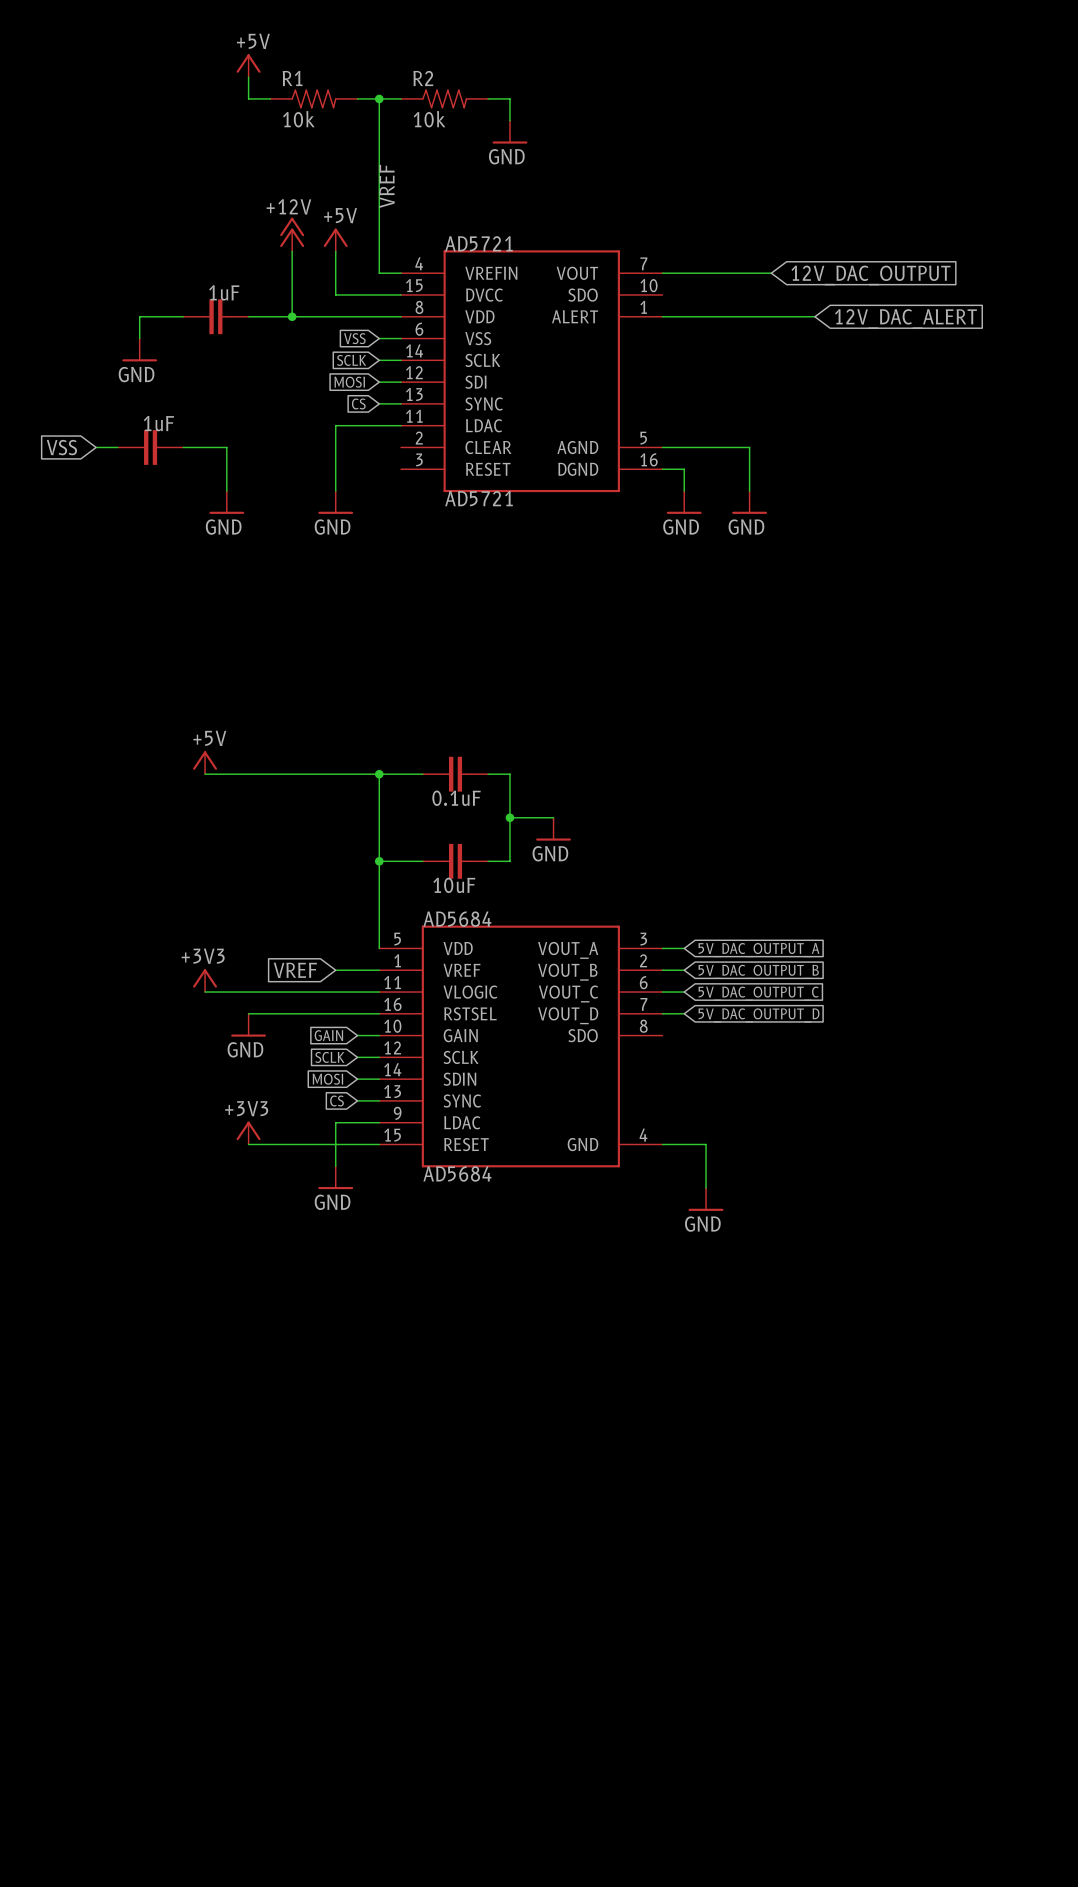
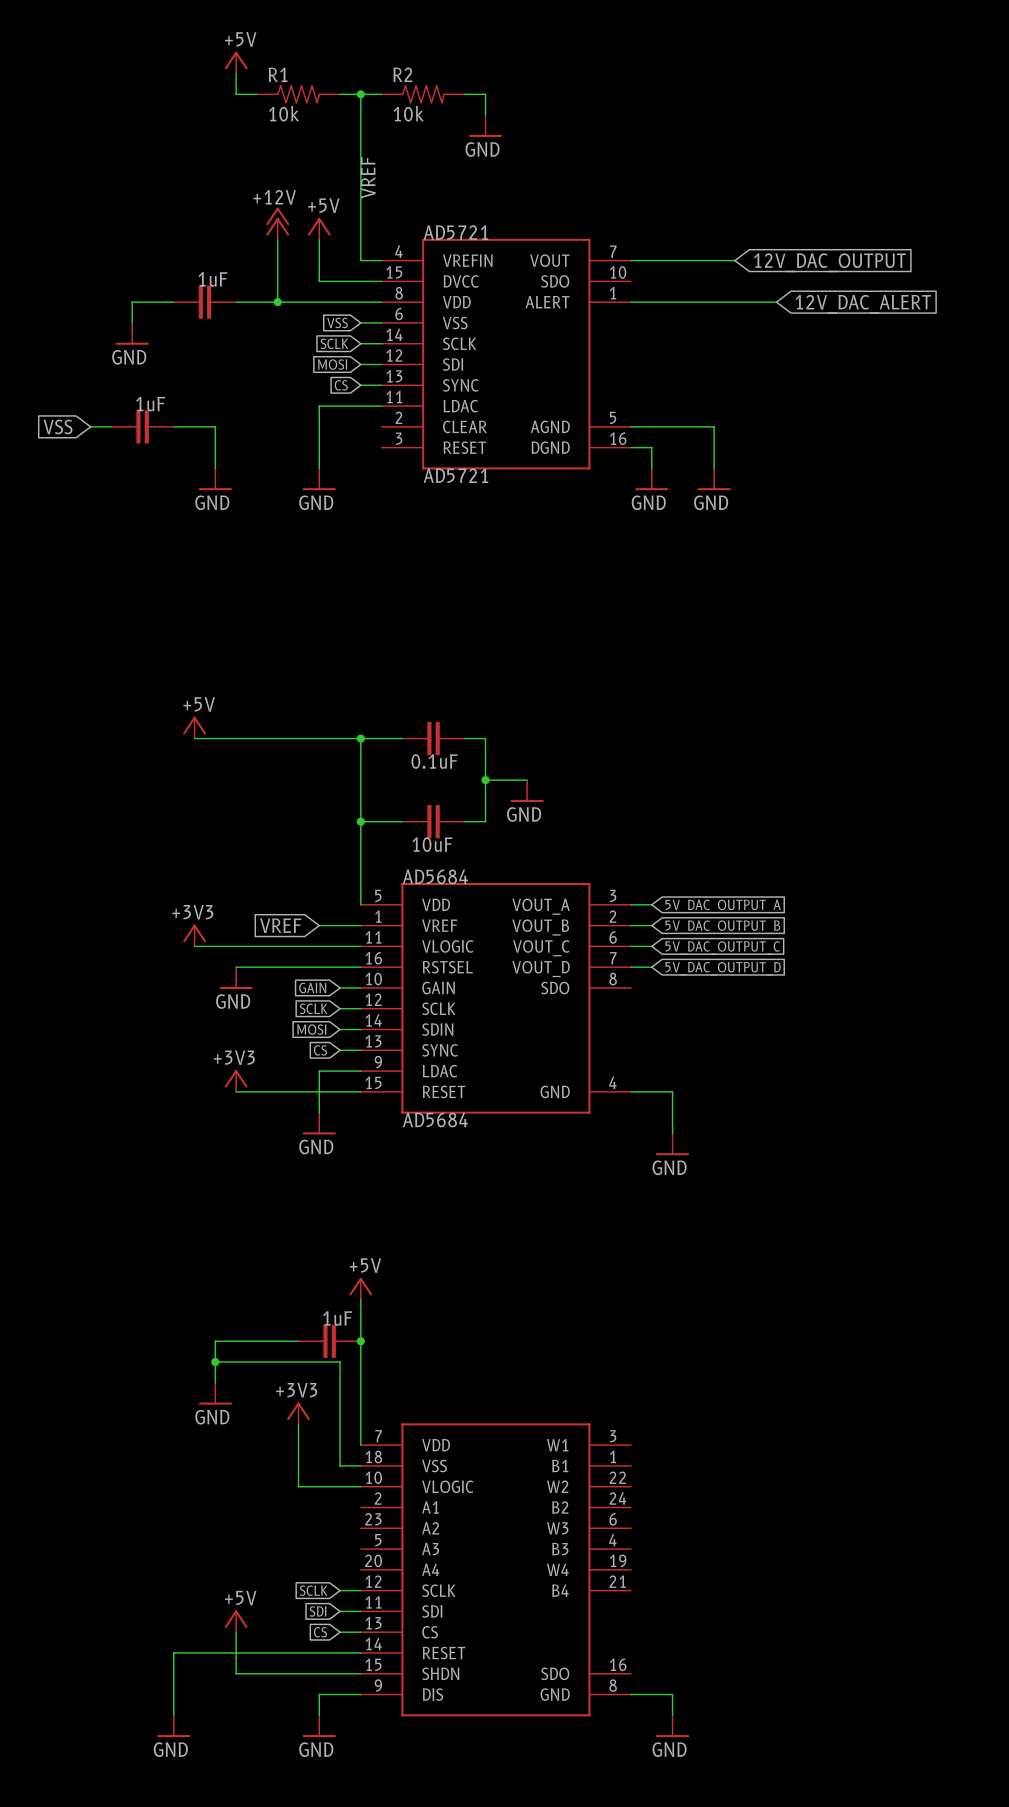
power symbol: none -> +5V (360, 1288)
wire: none -> (360, 1299) (360, 1445)
wire: none -> (298, 1341) (215, 1341) (215, 1382)
part: none -> 1uF (329, 1341)
junction: none -> (360, 1341)
wire: none -> (215, 1362) (340, 1362) (340, 1465) (360, 1465)
junction: none -> (215, 1362)
power symbol: none -> GND (215, 1393)
power symbol: none -> +3V3 (298, 1413)
wire: none -> (298, 1424) (298, 1486) (360, 1486)
part: none -> (495, 1569)
global label: none -> SCLK (313, 1590)
wire: none -> (340, 1590) (360, 1590)
global label: none -> SDI (317, 1611)
wire: none -> (340, 1611) (360, 1611)
power symbol: none -> +5V (236, 1621)
wire: none -> (236, 1632) (236, 1673) (360, 1673)
global label: none -> CS (320, 1632)
wire: none -> (340, 1632) (360, 1632)
wire: none -> (360, 1652) (173, 1652) (173, 1715)
wire: none -> (360, 1694) (319, 1694) (319, 1715)
wire: none -> (630, 1694) (672, 1694) (672, 1715)
power symbol: none -> GND (173, 1726)
power symbol: none -> GND (319, 1726)
power symbol: none -> GND (672, 1726)

